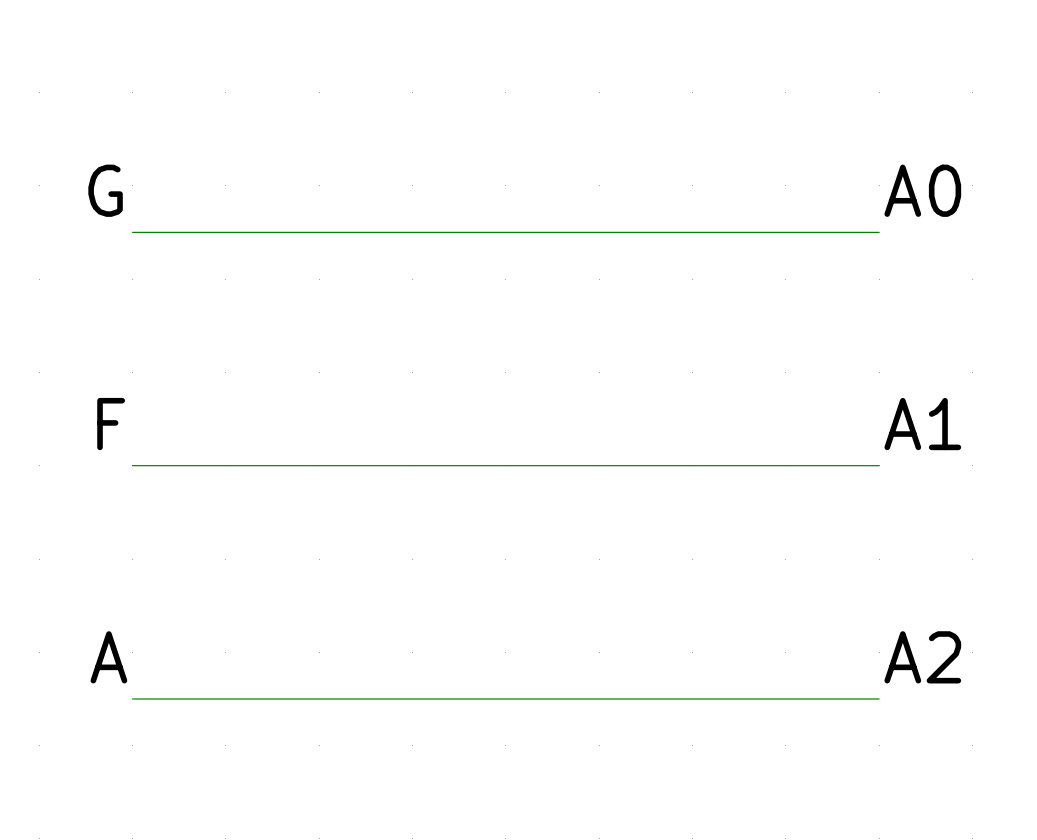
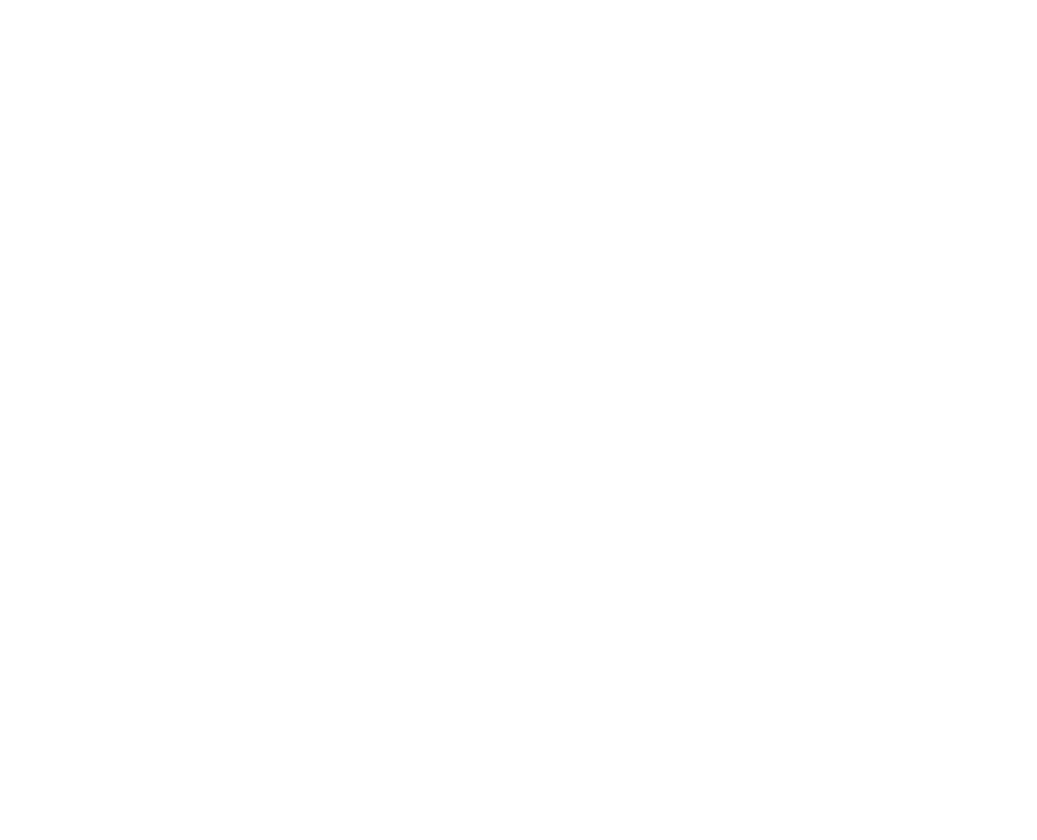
label: G (105, 190) -> none
label: A0 (922, 190) -> none
wire: (132, 232) (879, 232) -> none
label: F (111, 424) -> none
label: A1 (922, 424) -> none
wire: (132, 465) (879, 465) -> none
label: A (108, 657) -> none
label: A2 (922, 657) -> none
wire: (132, 698) (879, 698) -> none

